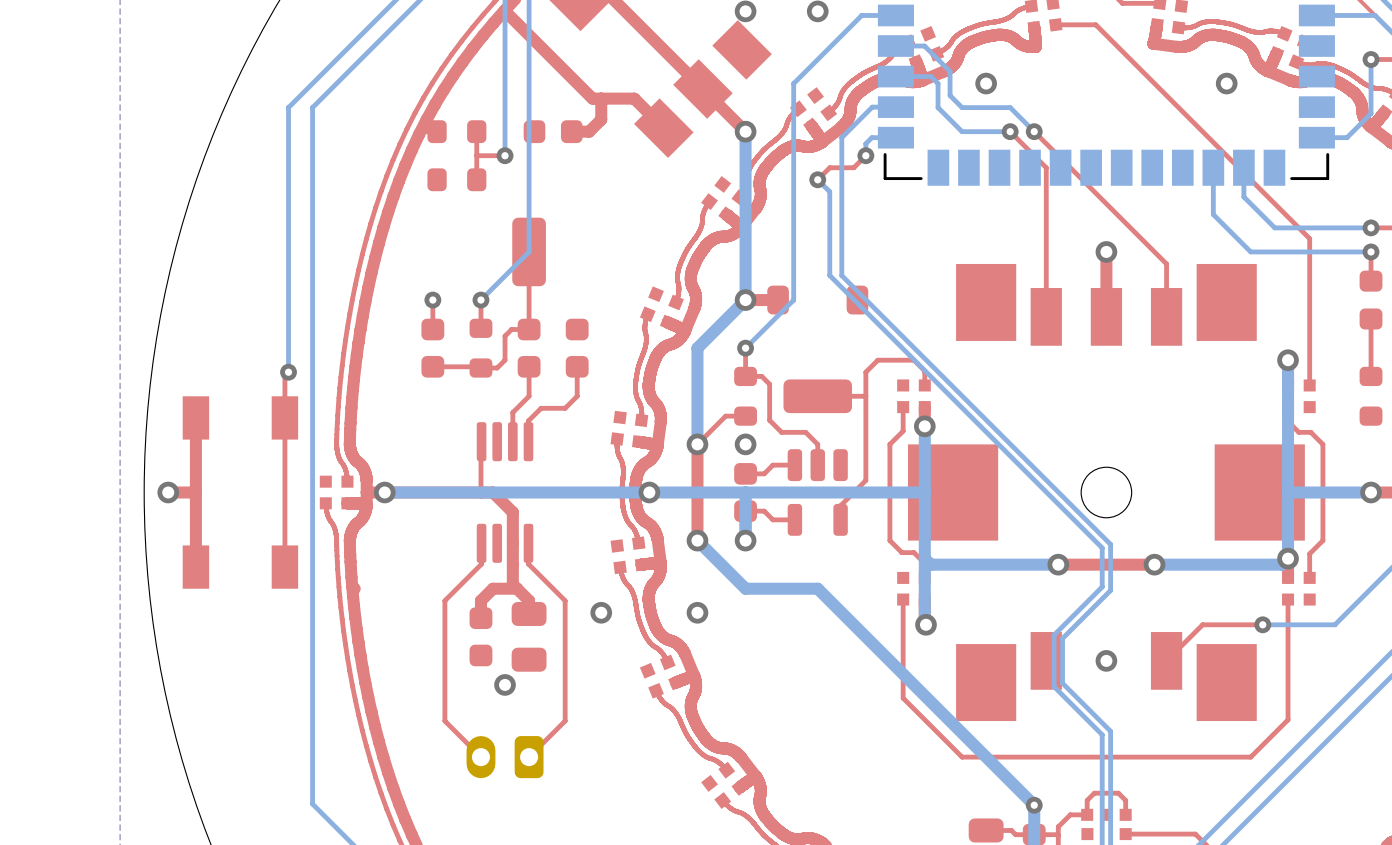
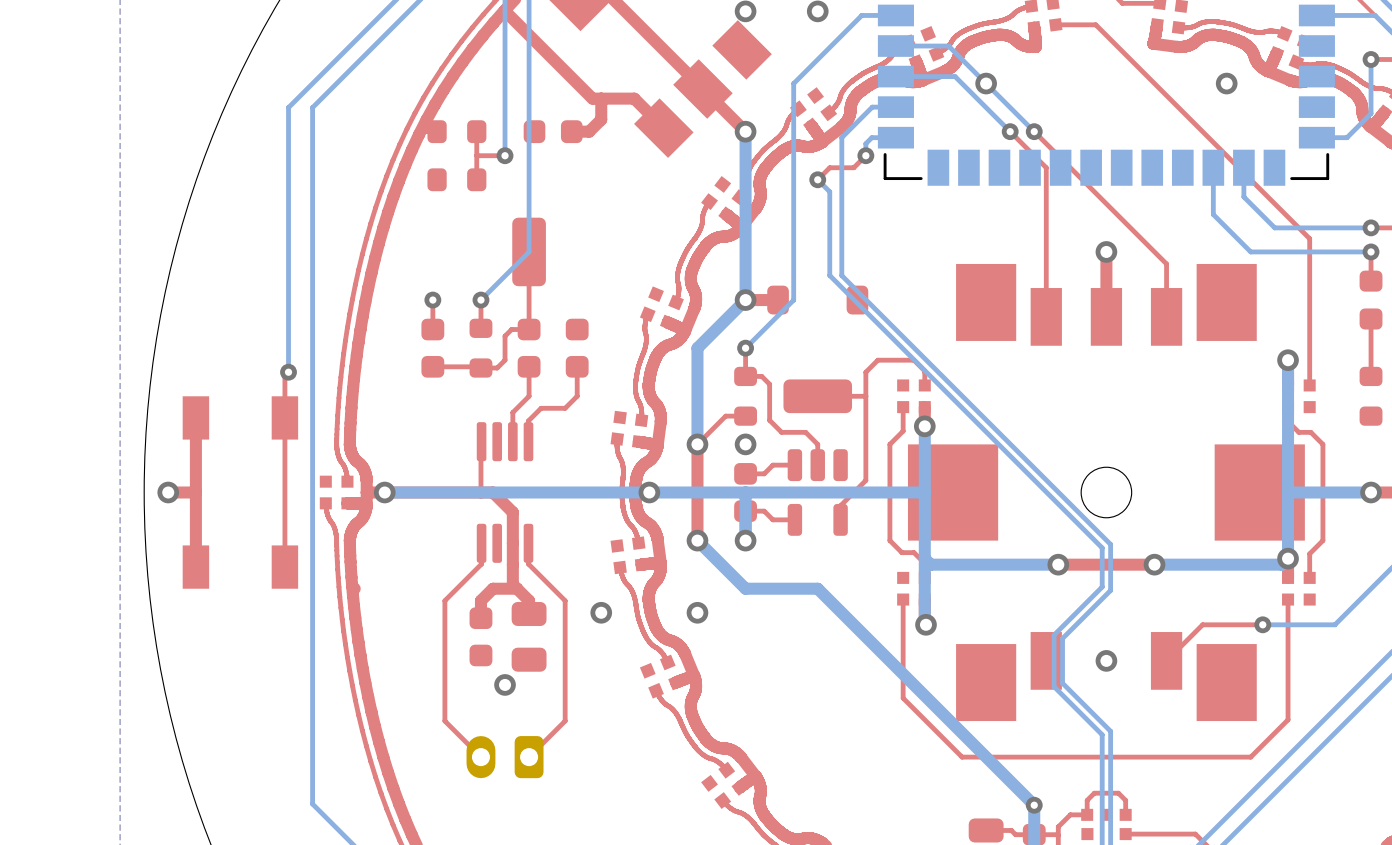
bottom track: (924, 46) (950, 71) (950, 95) (962, 107) (1010, 107) -> (924, 46) (948, 46) (1010, 107)
bottom track: (931, 76) (938, 83) (938, 107) (962, 131) (1010, 131) -> (931, 76) (955, 76) (1010, 131)

